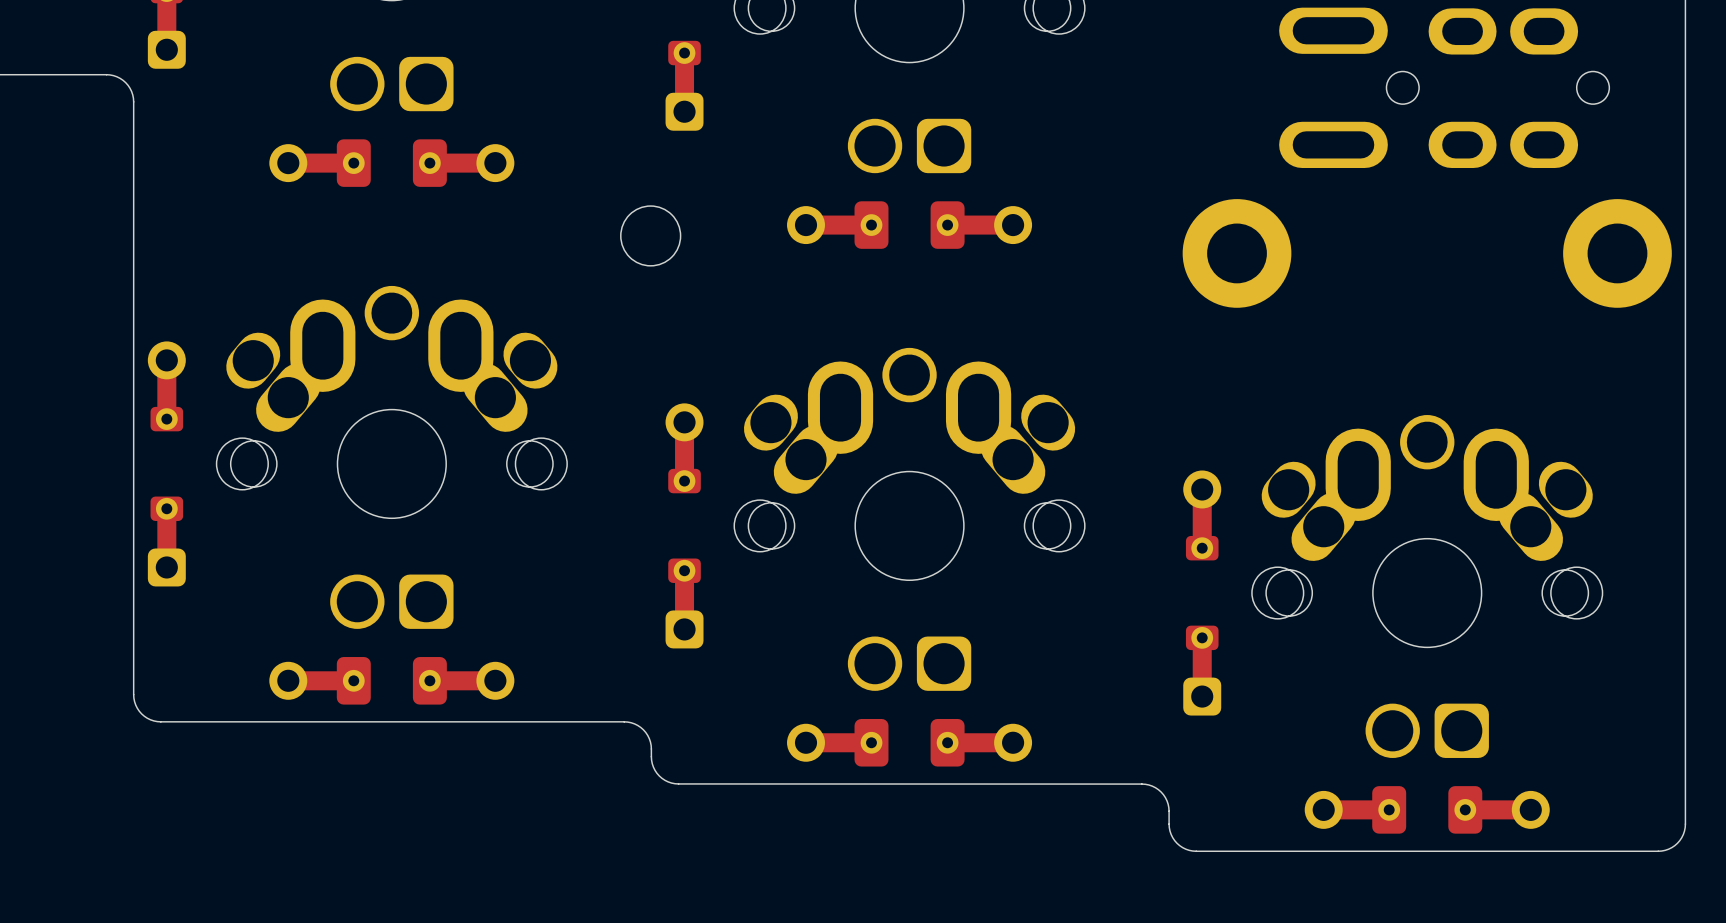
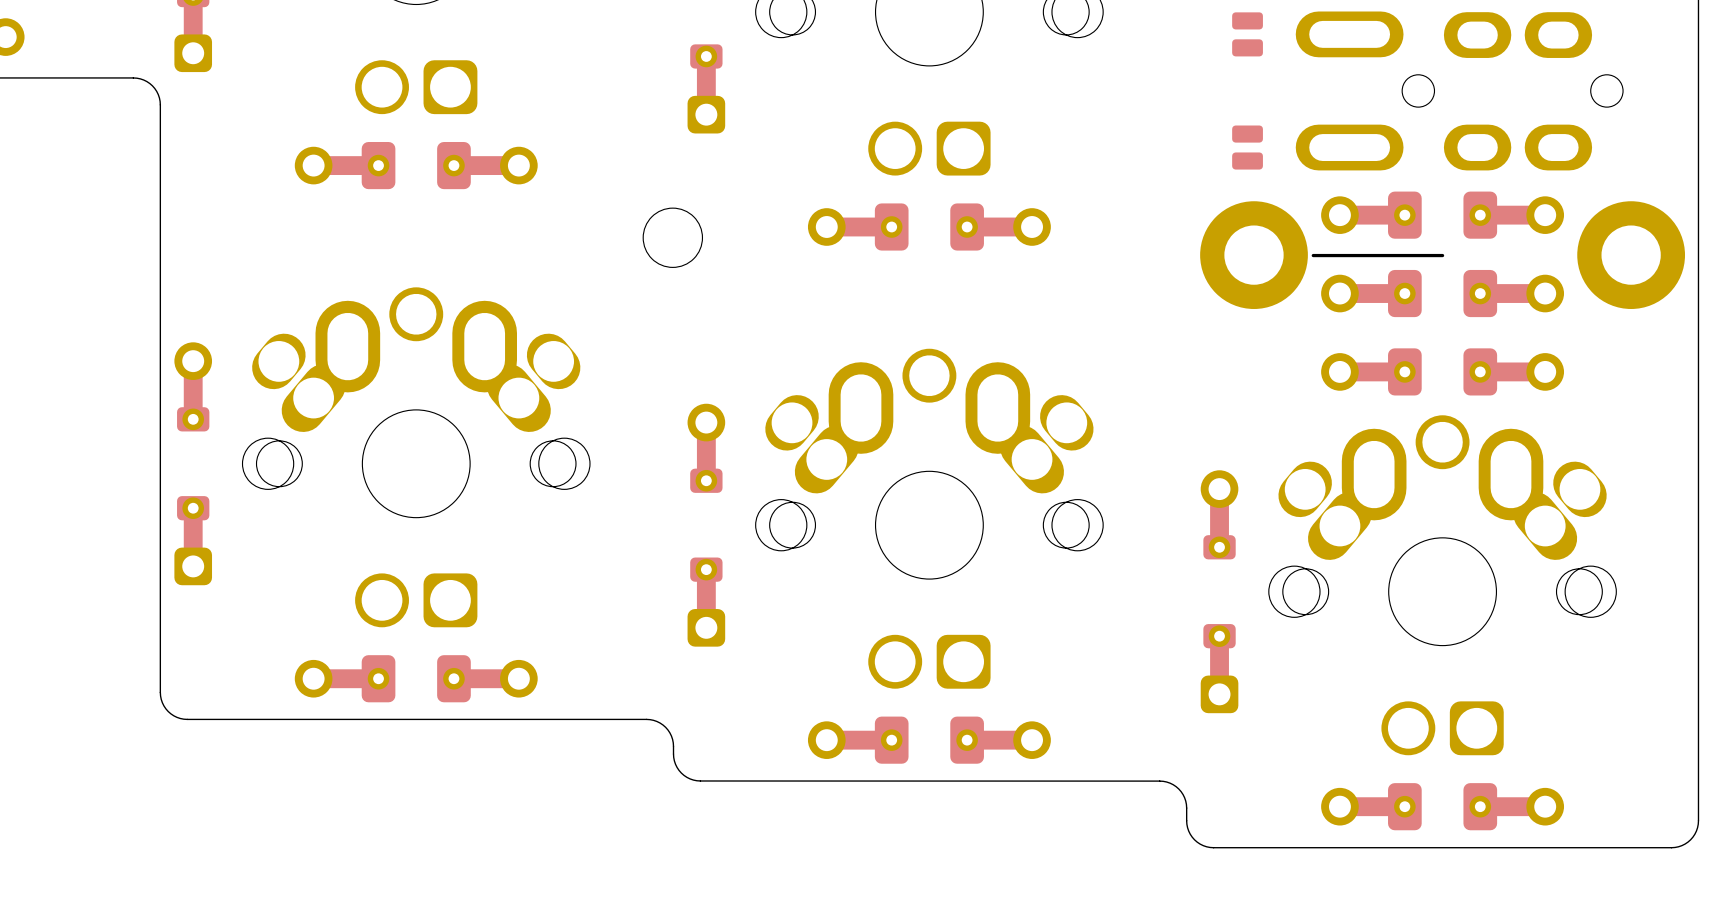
part: none -> (1247, 34)
part: none -> (1247, 147)
part: none -> (1442, 215)
line: none -> (1313, 255) (1442, 255)
part: none -> (1442, 293)
part: none -> (1442, 371)

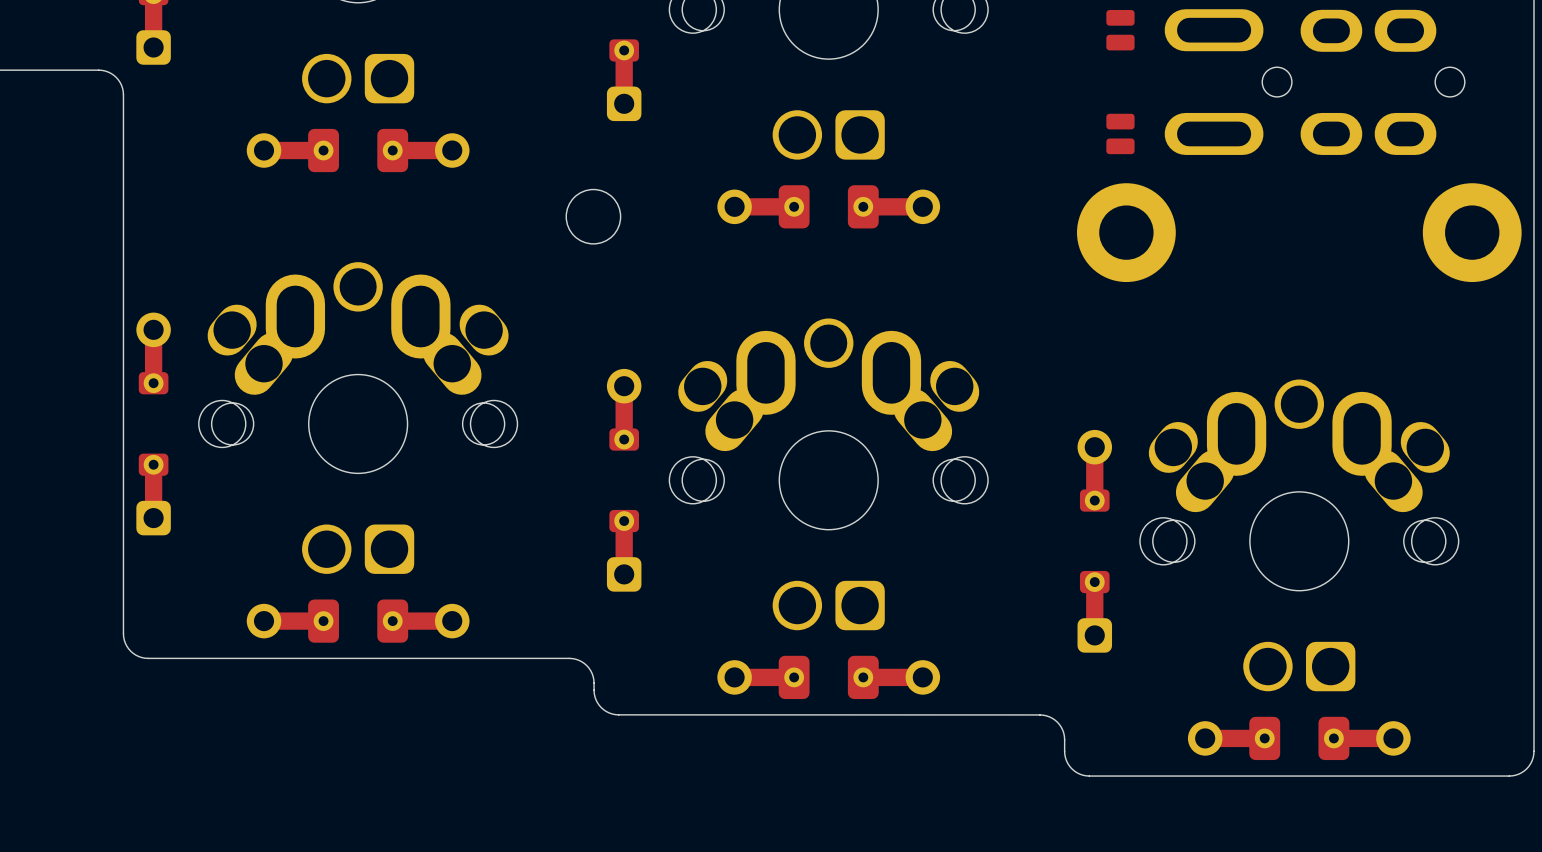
part: (1442, 215) -> none
line: (1313, 255) (1442, 255) -> none
part: (1442, 293) -> none
part: (1442, 371) -> none

